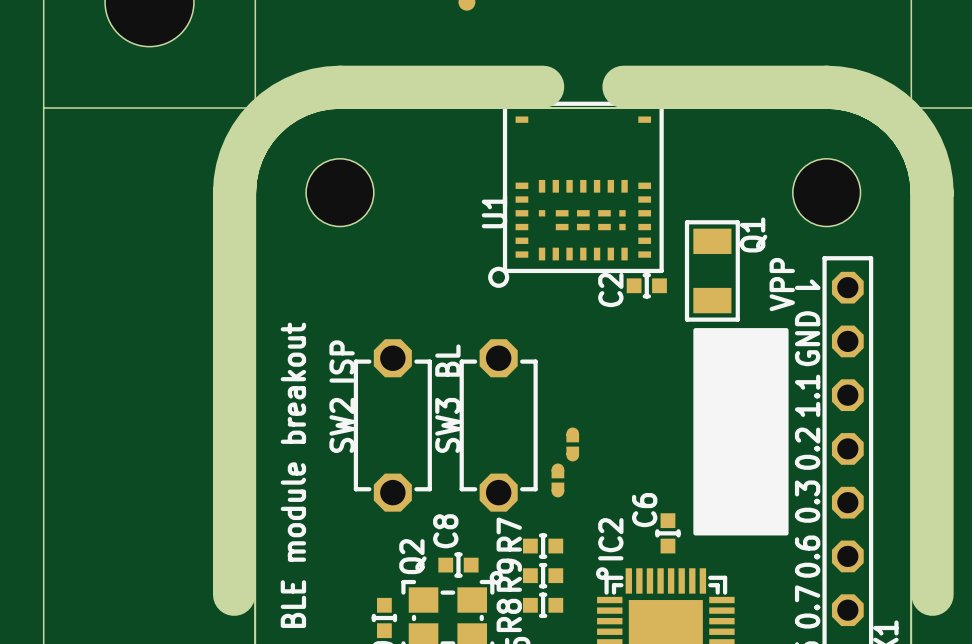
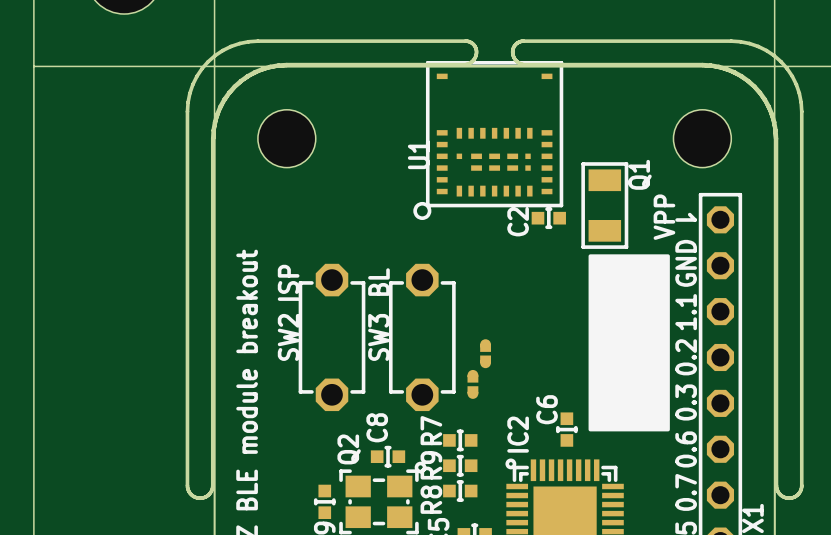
board edge: none -> (257, 41) (465, 41) (473, 44) (476, 51) (473, 60) (465, 64) (286, 64) (270, 66) (247, 75) (234, 86) (224, 99) (214, 122) (212, 138) (212, 485) (209, 494) (198, 498) (191, 494) (187, 485) (188, 102) (196, 76) (215, 55) (239, 43) (257, 41)
board edge: none -> (523, 41) (740, 41) (758, 46) (774, 55) (792, 76) (799, 93) (801, 111) (801, 485) (800, 491) (795, 496) (784, 497) (779, 493) (776, 487) (776, 138) (774, 122) (765, 99) (754, 86) (741, 75) (726, 68) (710, 65) (522, 64) (515, 60) (512, 51) (515, 44) (523, 41)
board edge: (543, 86) (328, 87) (305, 92) (283, 103) (265, 117) (250, 136) (240, 157) (234, 192) (234, 594) -> none
board edge: (623, 86) (838, 87) (861, 92) (882, 103) (901, 117) (916, 136) (926, 157) (932, 192) (932, 594) -> none

